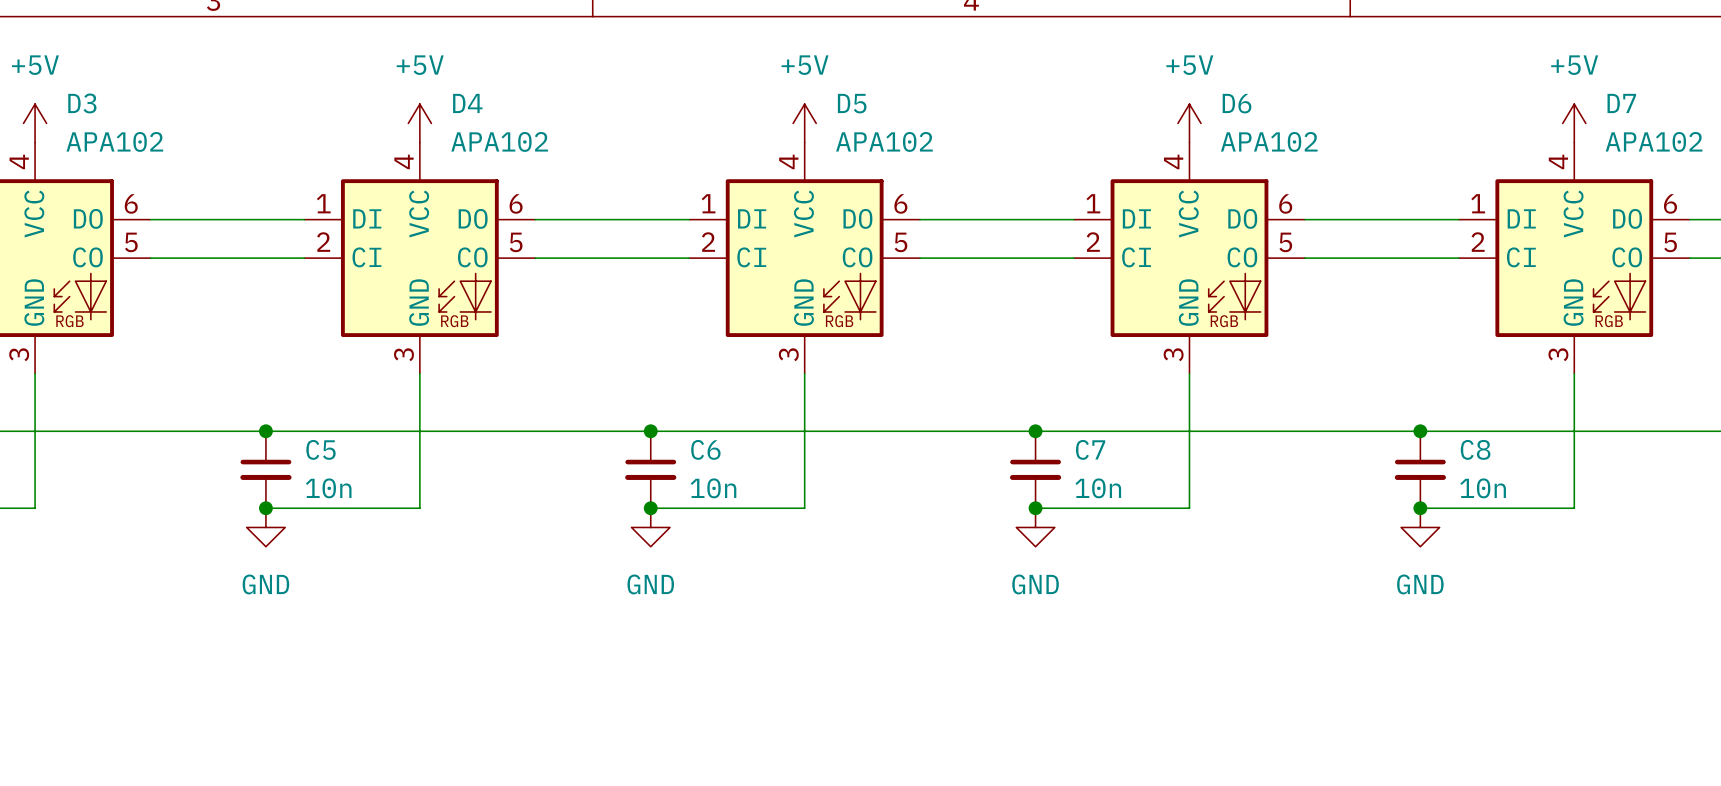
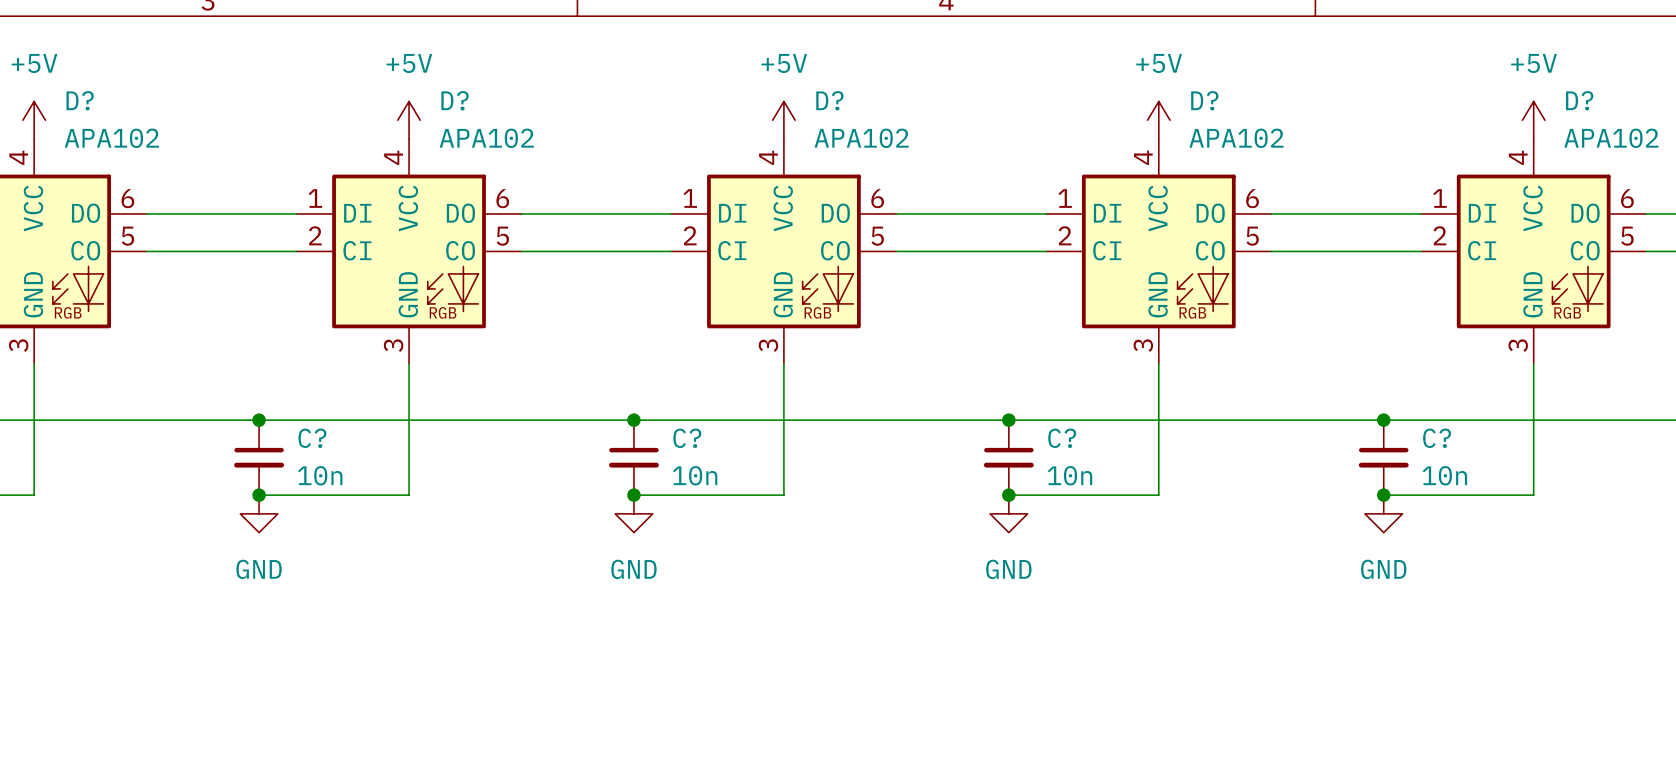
D3 name: D3 (82, 103) -> D? (80, 100)
D4 name: D4 (467, 103) -> D? (455, 100)
D5 name: D5 (852, 103) -> D? (829, 100)
D6 name: D6 (1237, 103) -> D? (1204, 100)
D7 name: D7 (1621, 103) -> D? (1579, 100)
C5 name: C5 (321, 449) -> C? (312, 438)
C6 name: C6 (705, 449) -> C? (687, 438)
C7 name: C7 (1090, 449) -> C? (1062, 438)
C8 name: C8 (1475, 449) -> C? (1437, 438)

